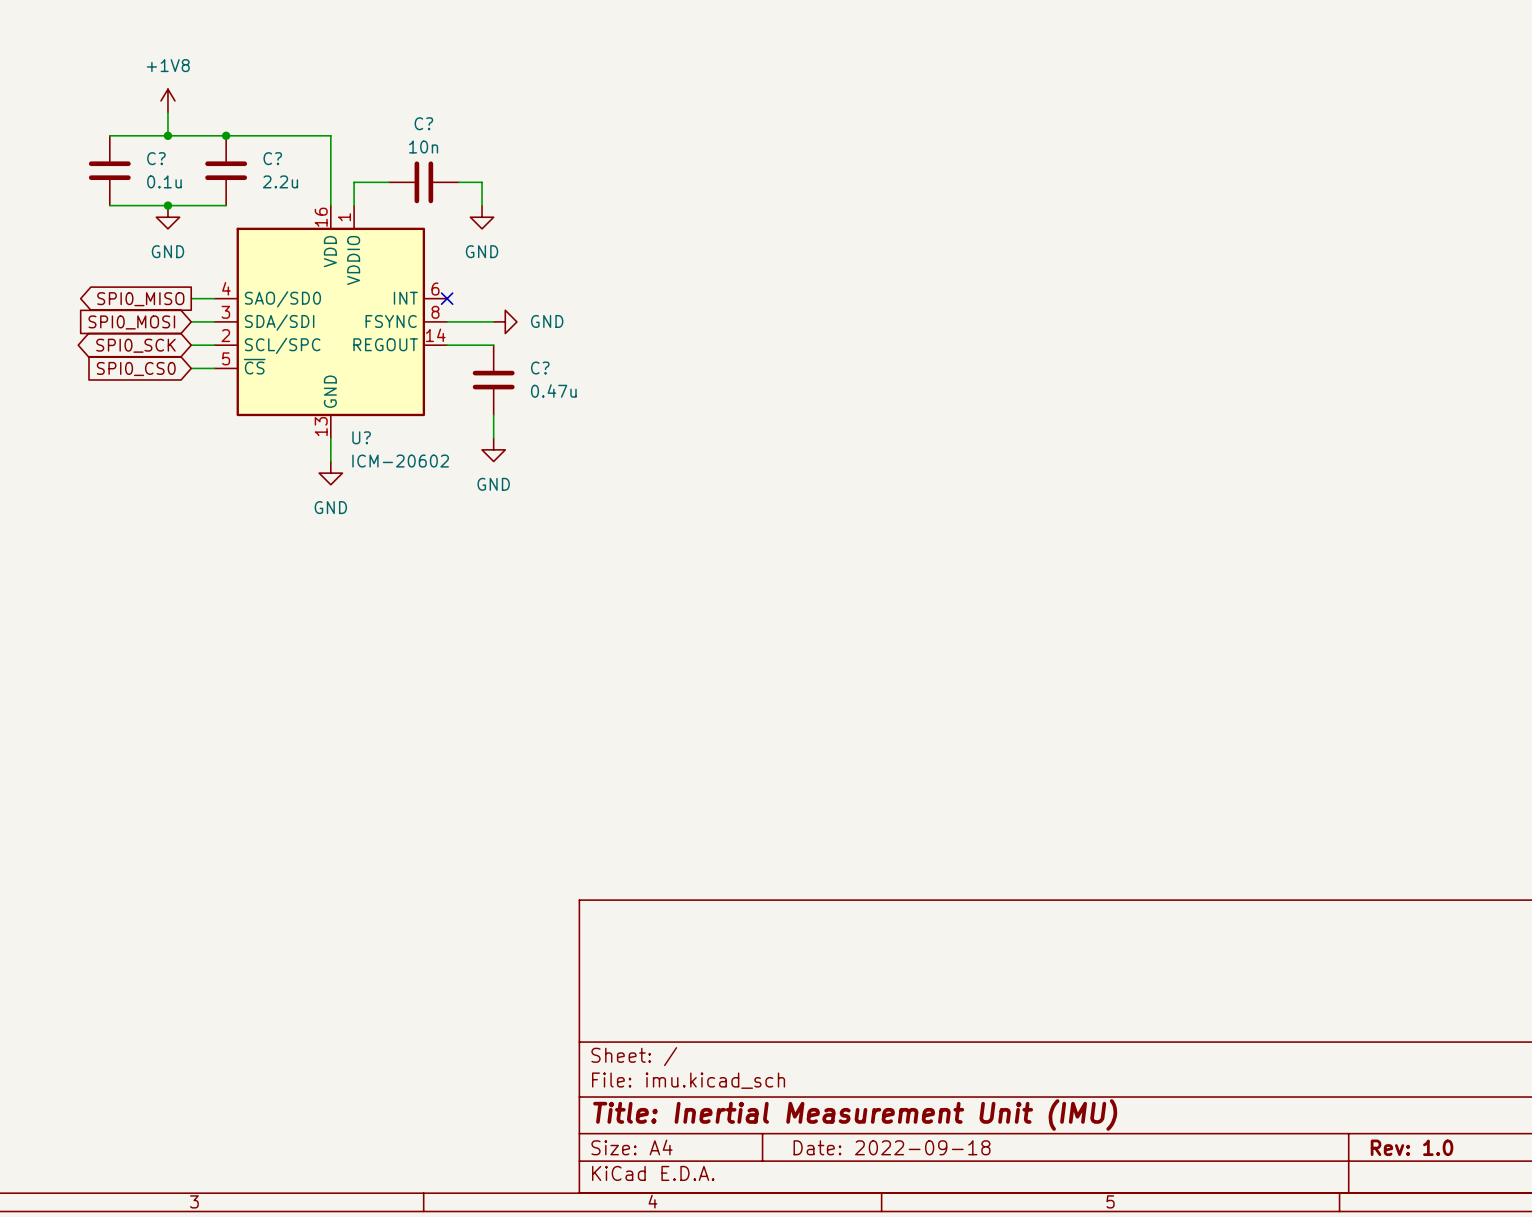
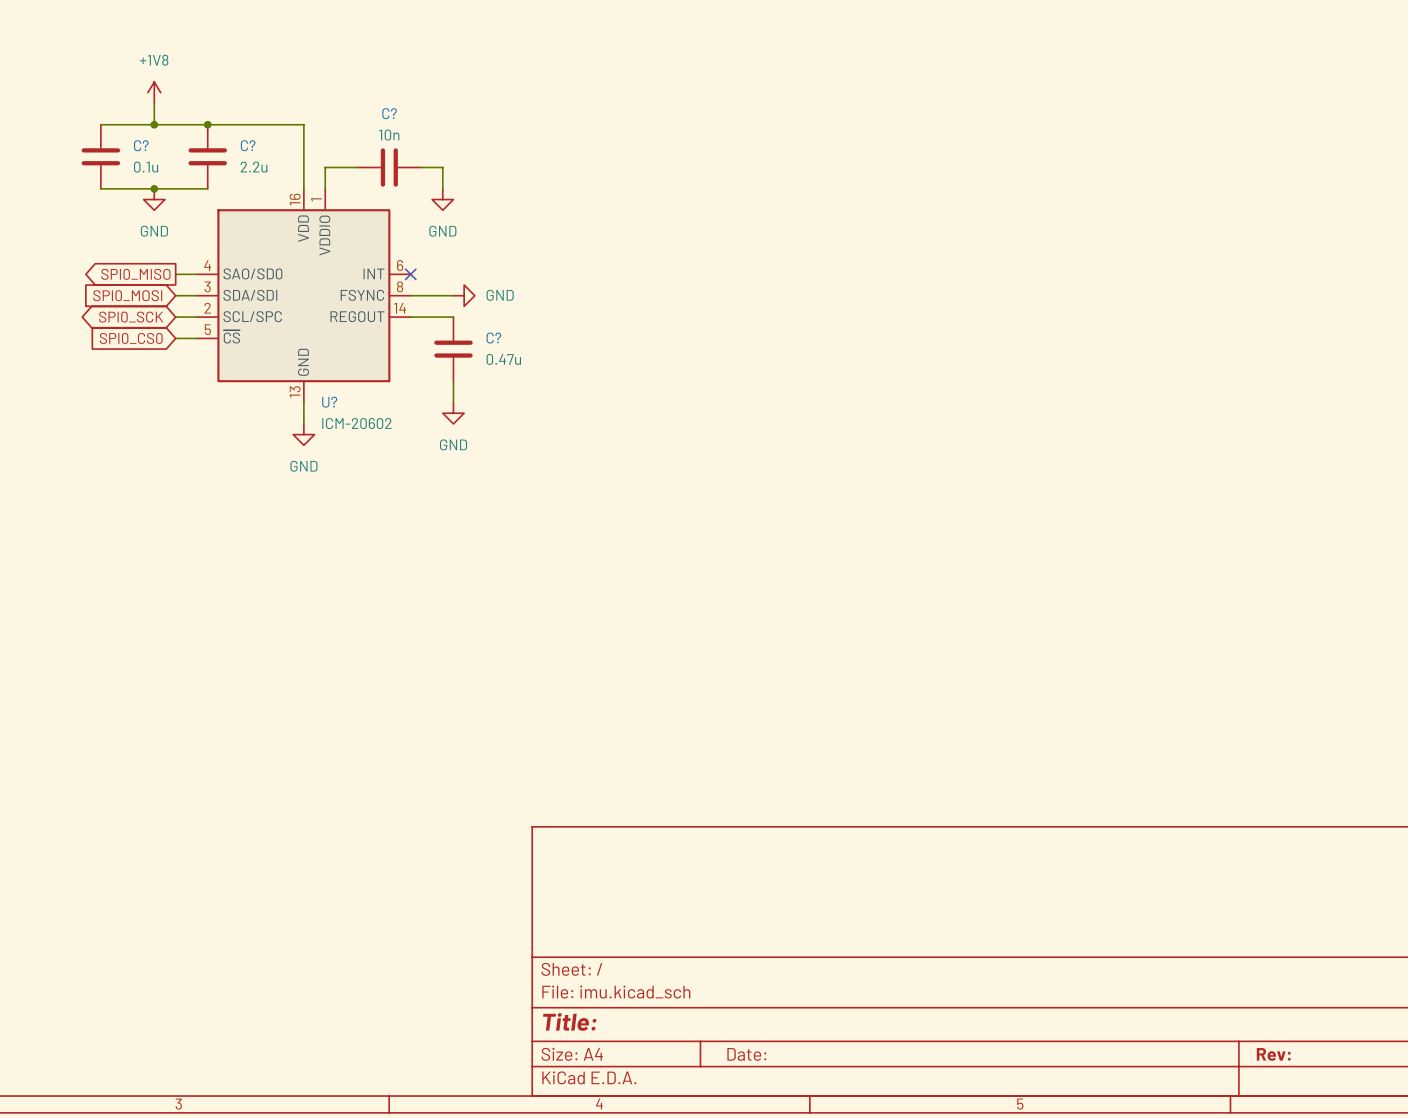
title block: Title: Inertial Measurement Unit (IMU) (855, 1115) -> Title: (569, 1021)
title block: Date: 2022-09-18 (892, 1147) -> Date: (746, 1054)
title block: Rev: 1.0 (1412, 1147) -> Rev: (1273, 1054)

